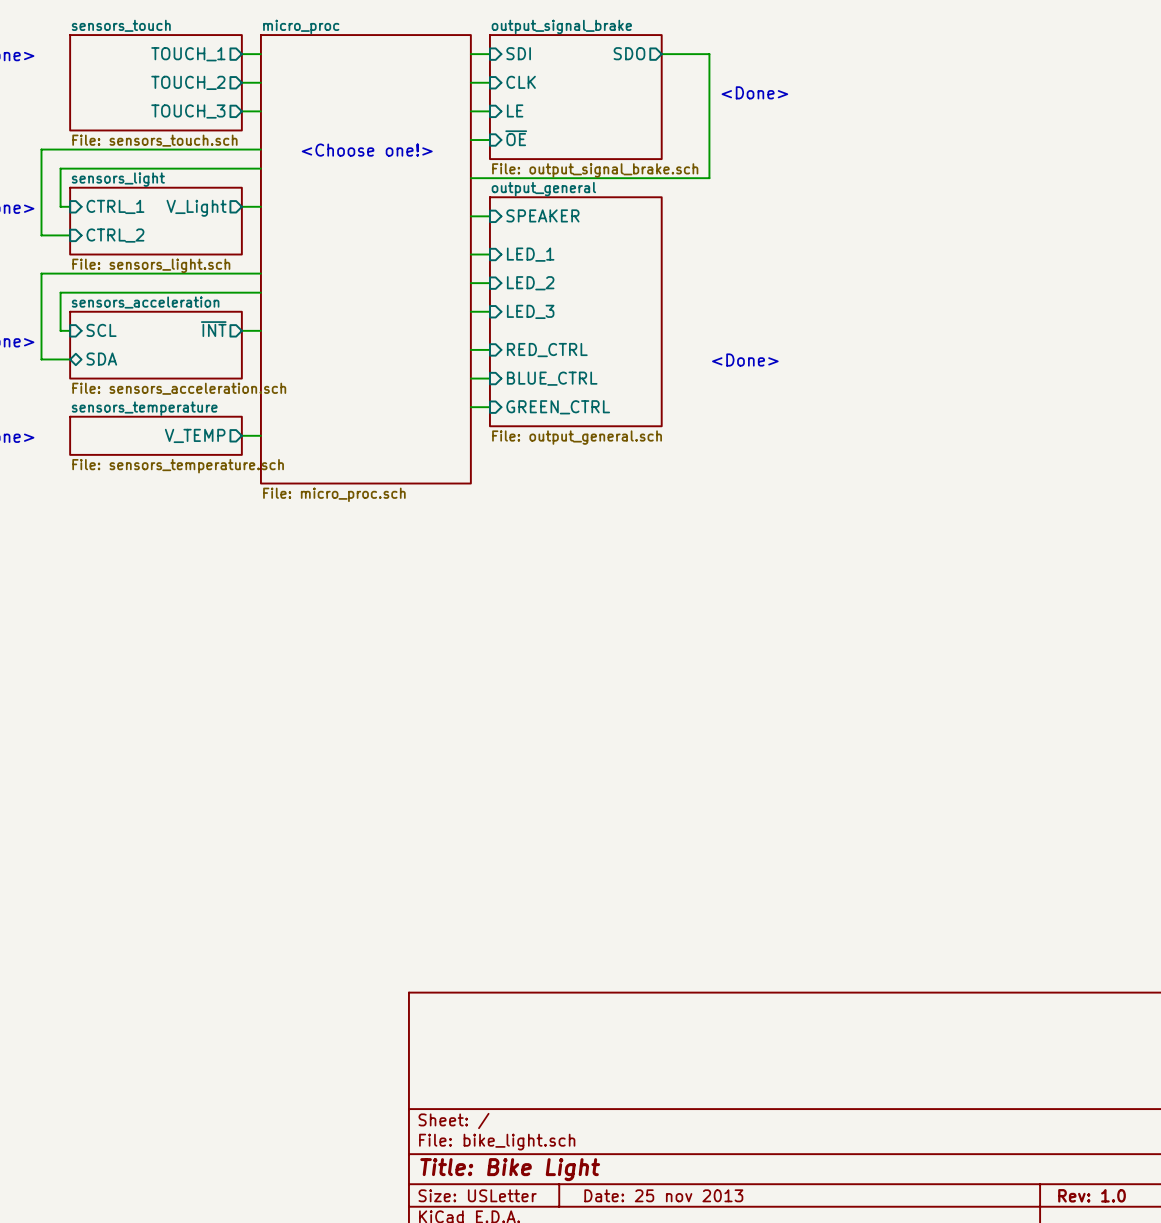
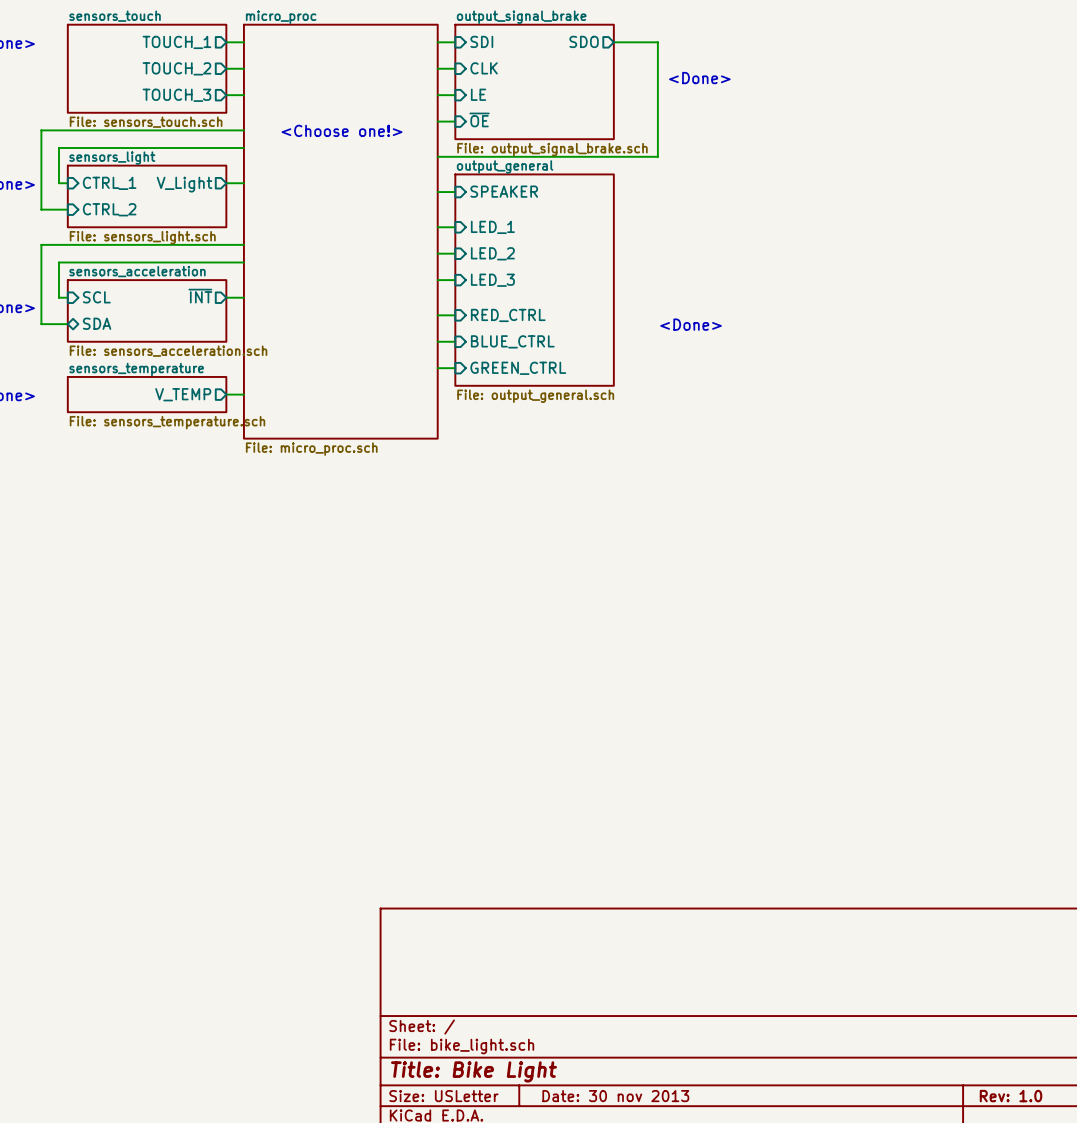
title block: Date: 25 nov 2013 (663, 1195) -> Date: 30 nov 2013 (615, 1096)

